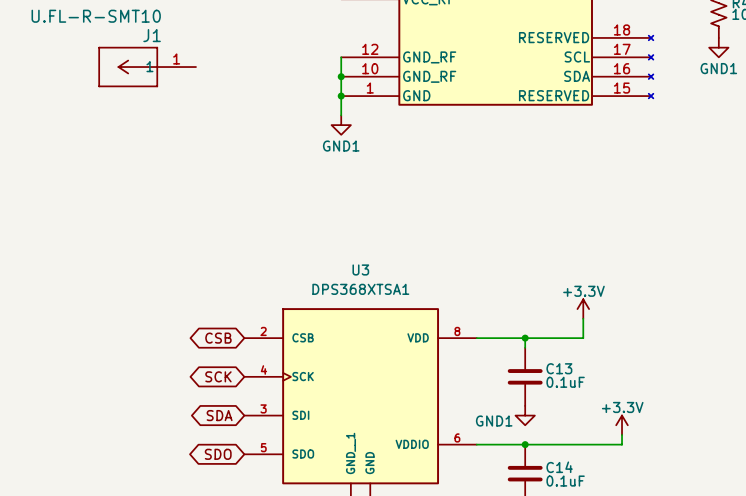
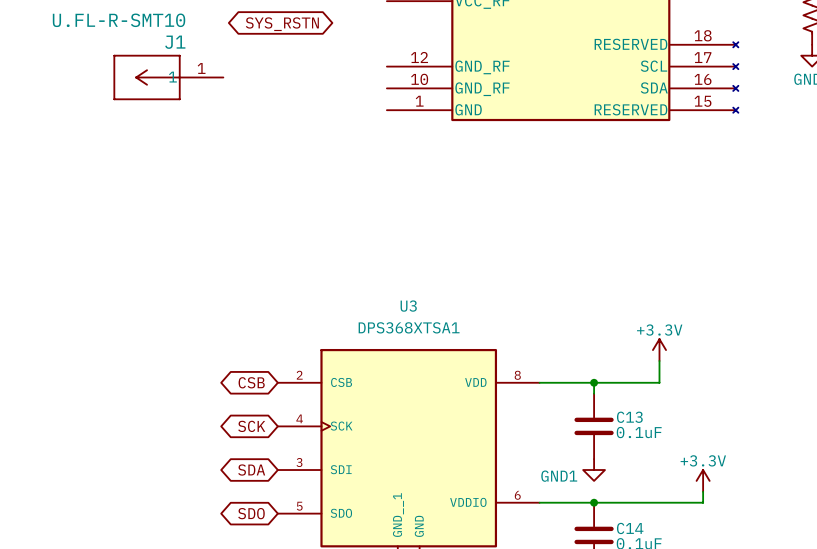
global label: none -> SYS_RSTN (282, 24)
wire: (341, 57) (341, 115) -> none
junction: (341, 76) -> none
junction: (341, 96) -> none
power symbol: GND1 (341, 125) -> none

